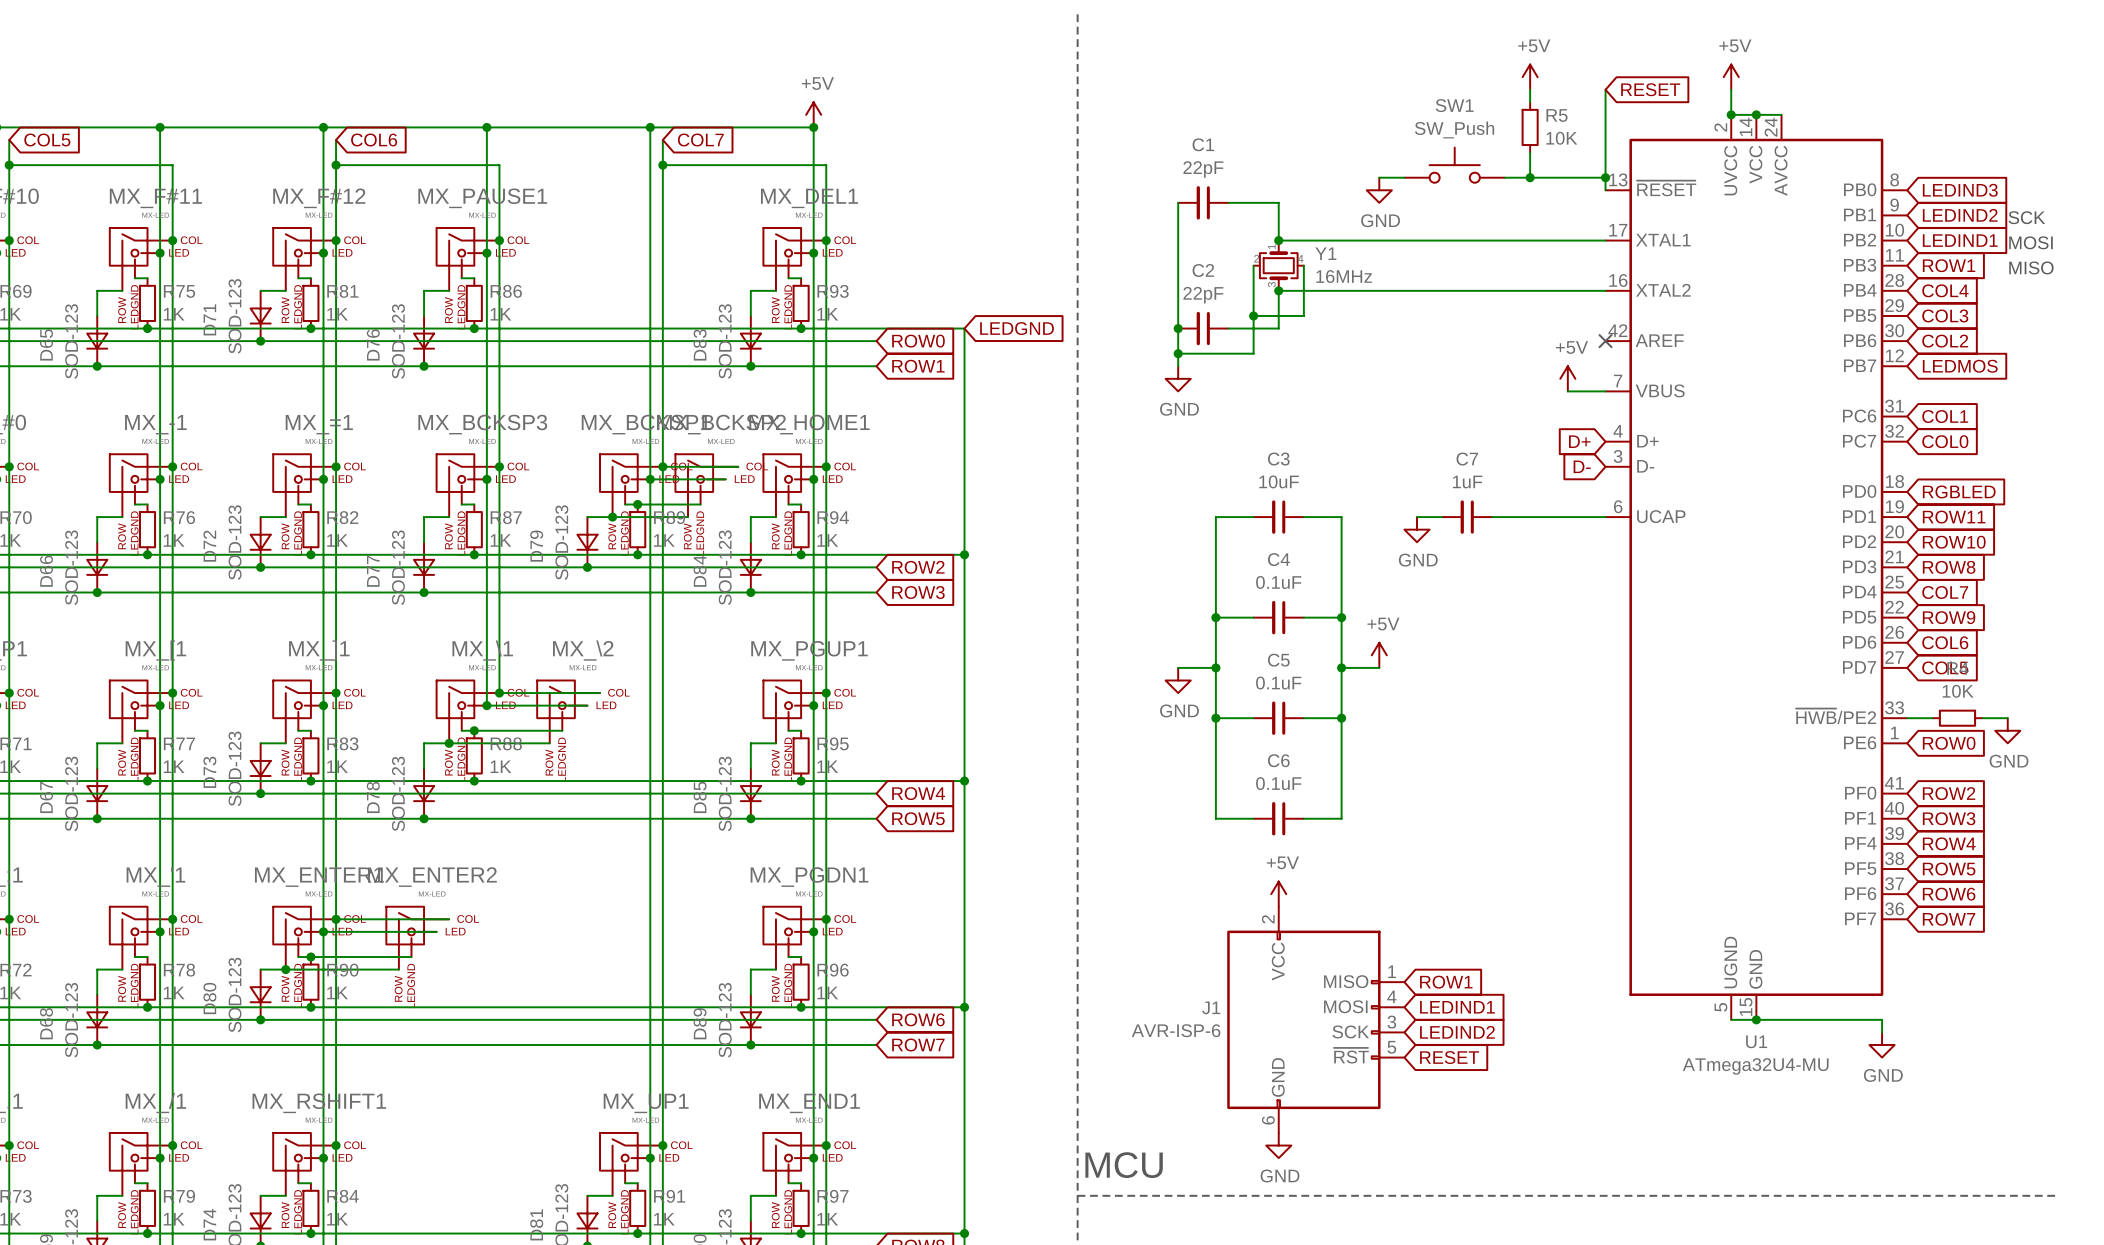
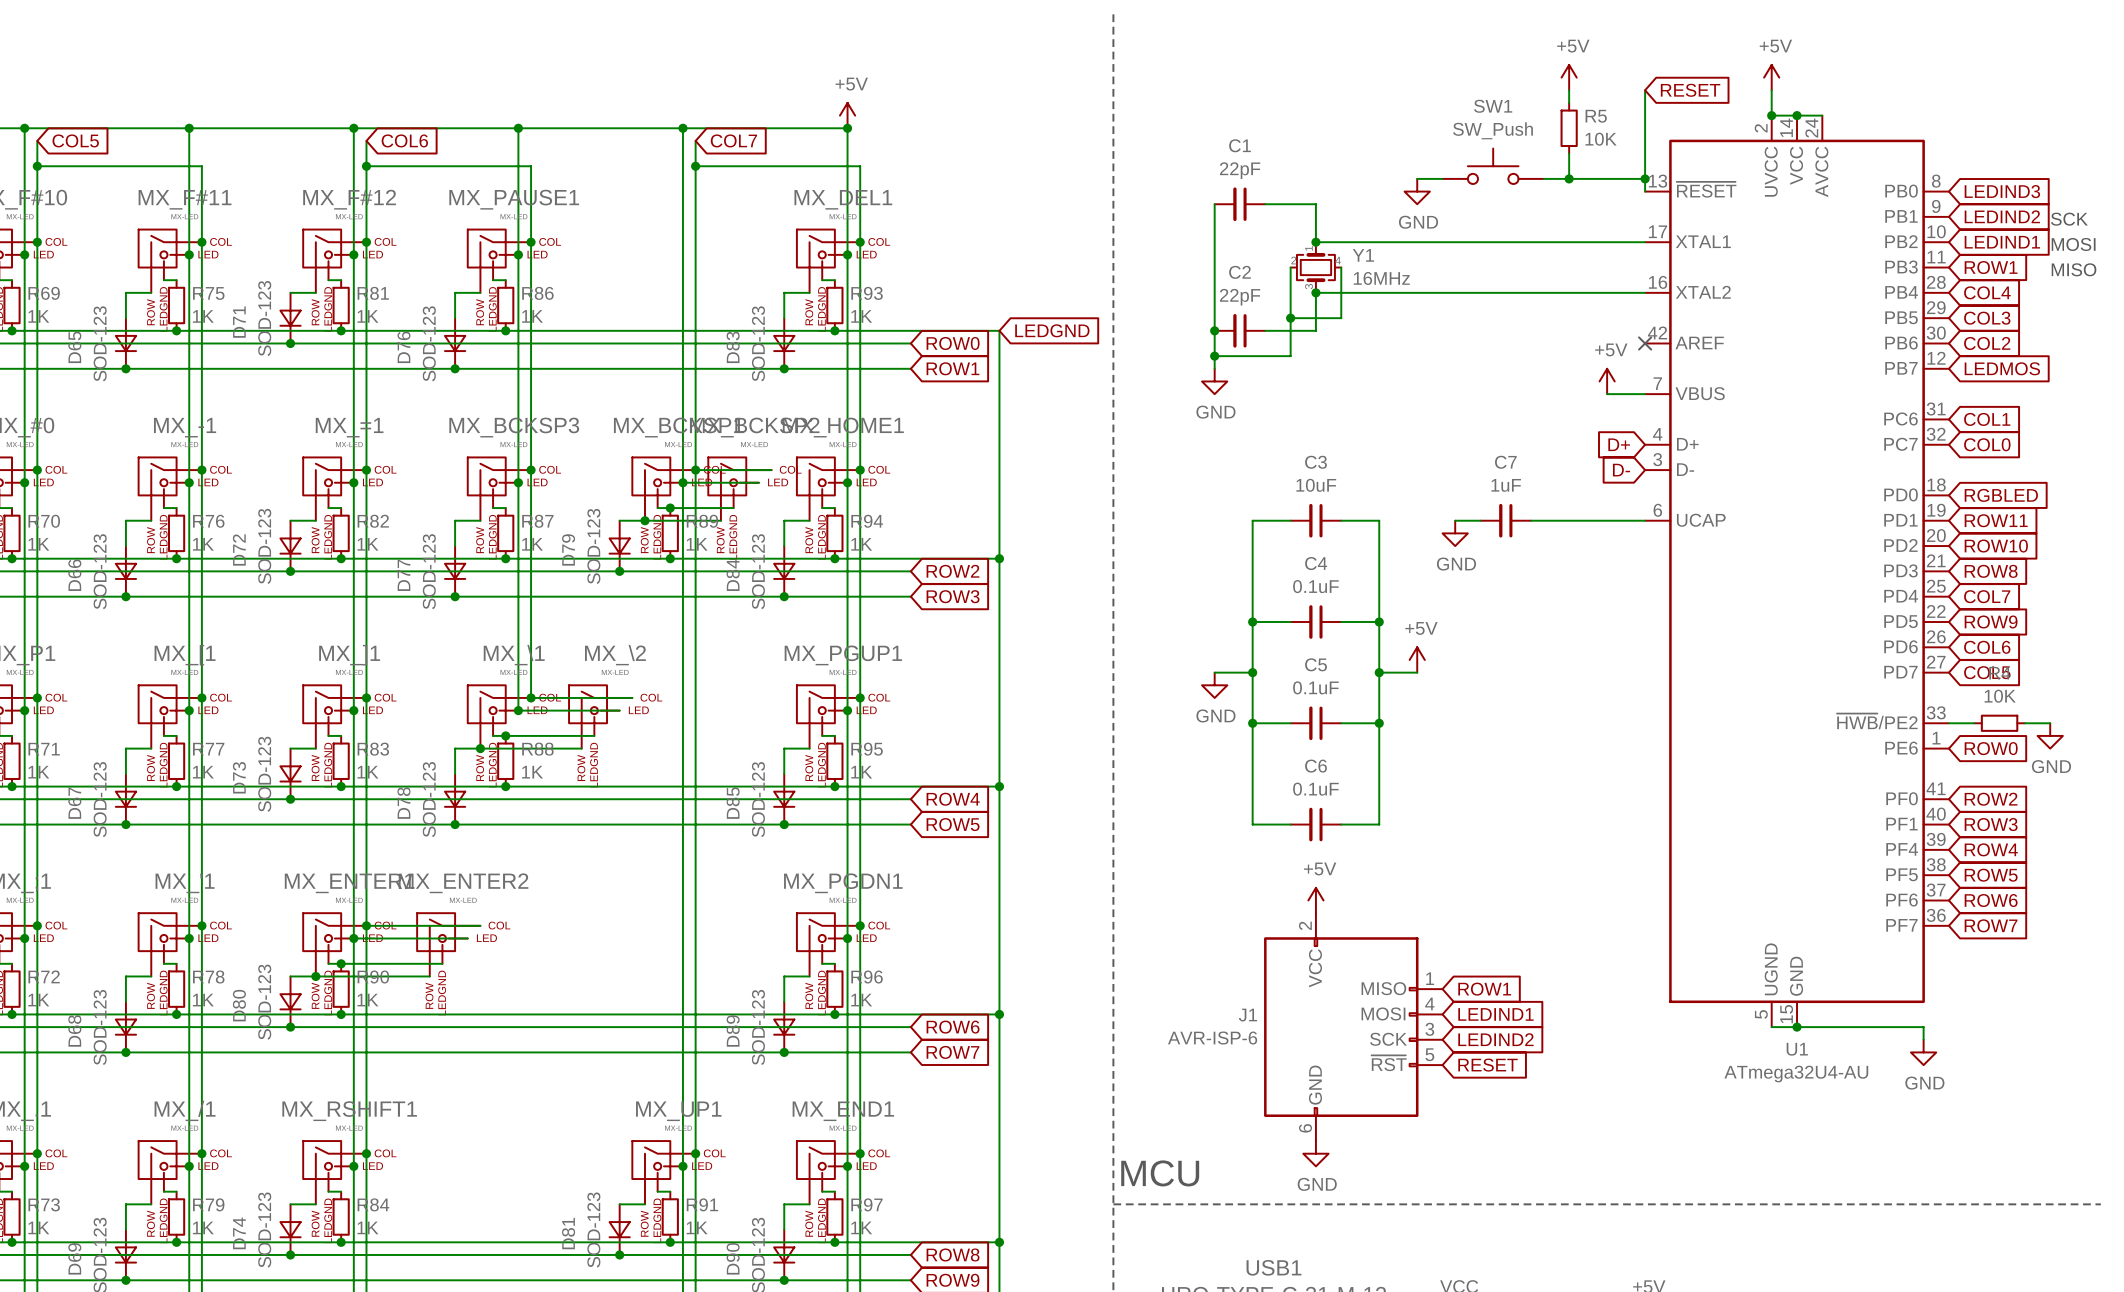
U1 value: ATmega32U4-MU (1755, 1066) -> ATmega32U4-AU (1796, 1074)

